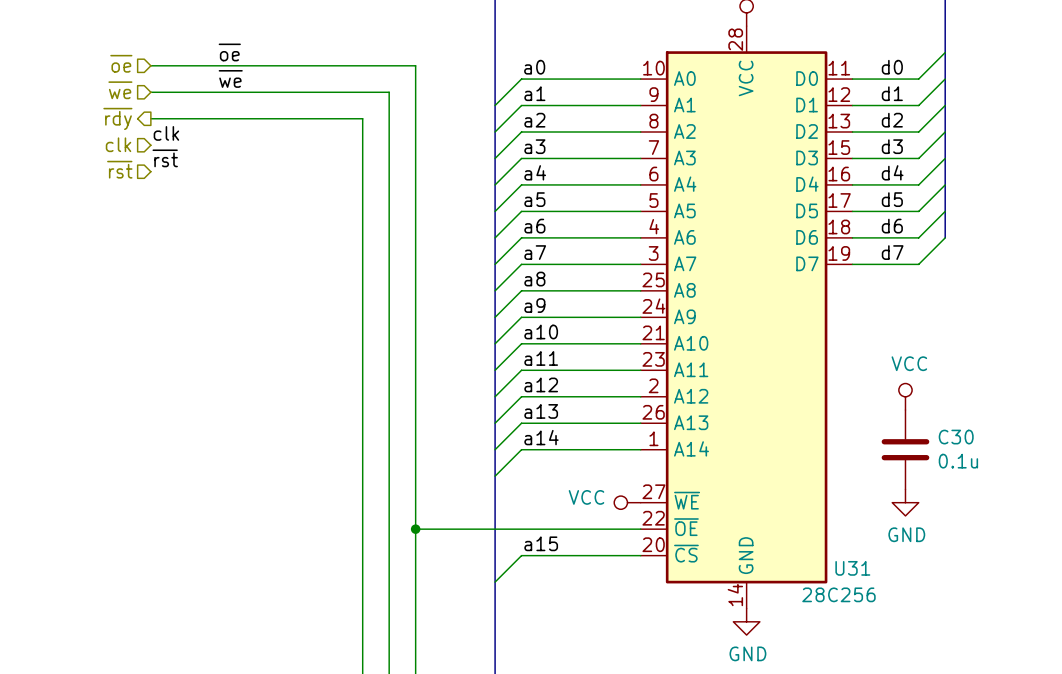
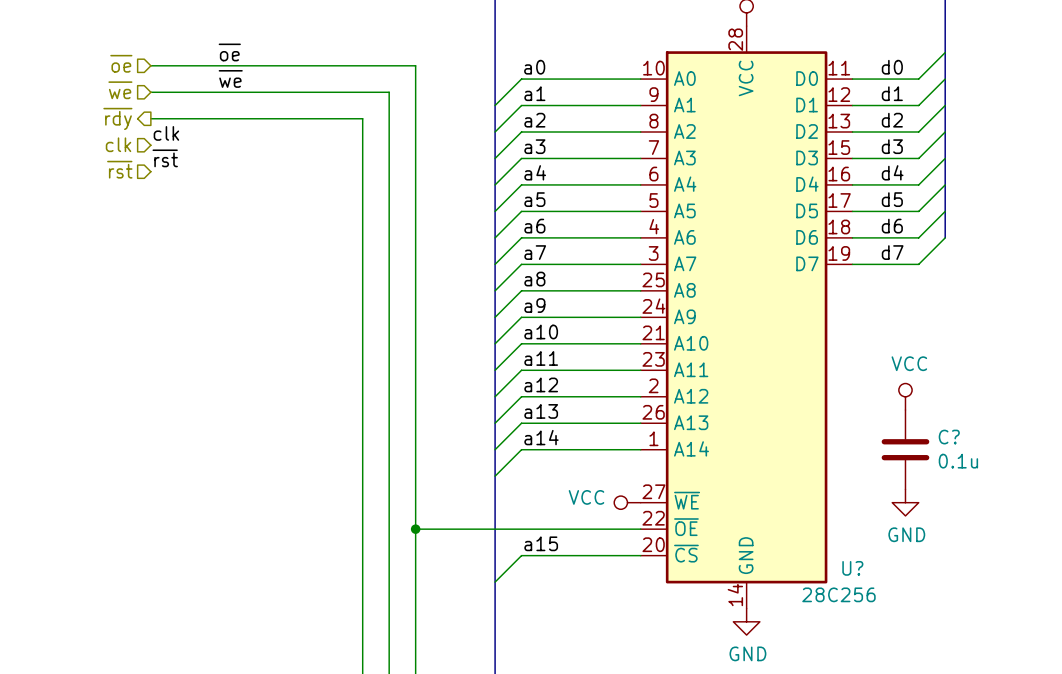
C30 name: C30 (956, 437) -> C? (949, 437)
U31 name: U31 (852, 568) -> U? (852, 568)

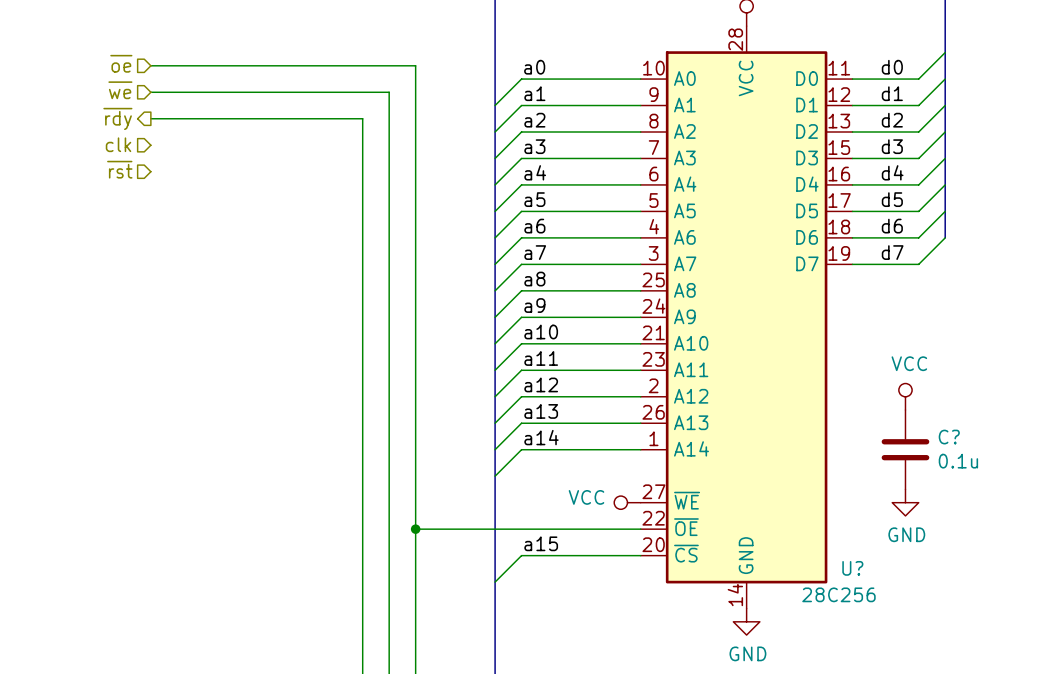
label: ~{oe} (229, 52) -> none
label: ~{we} (230, 78) -> none
label: clk (166, 133) -> none
label: ~{rst} (165, 158) -> none

